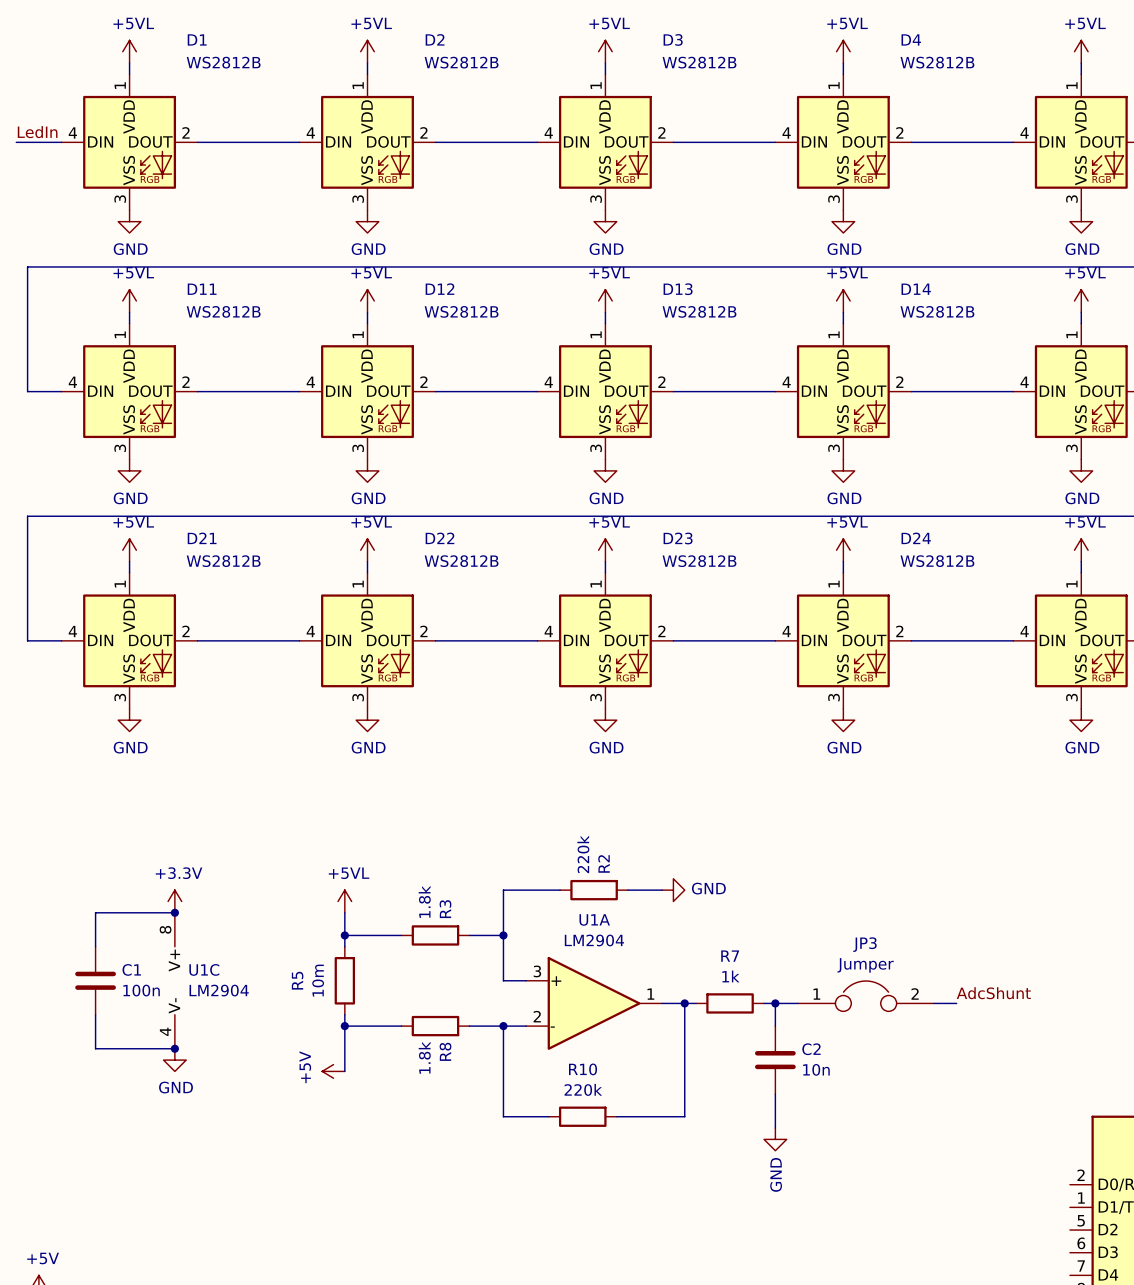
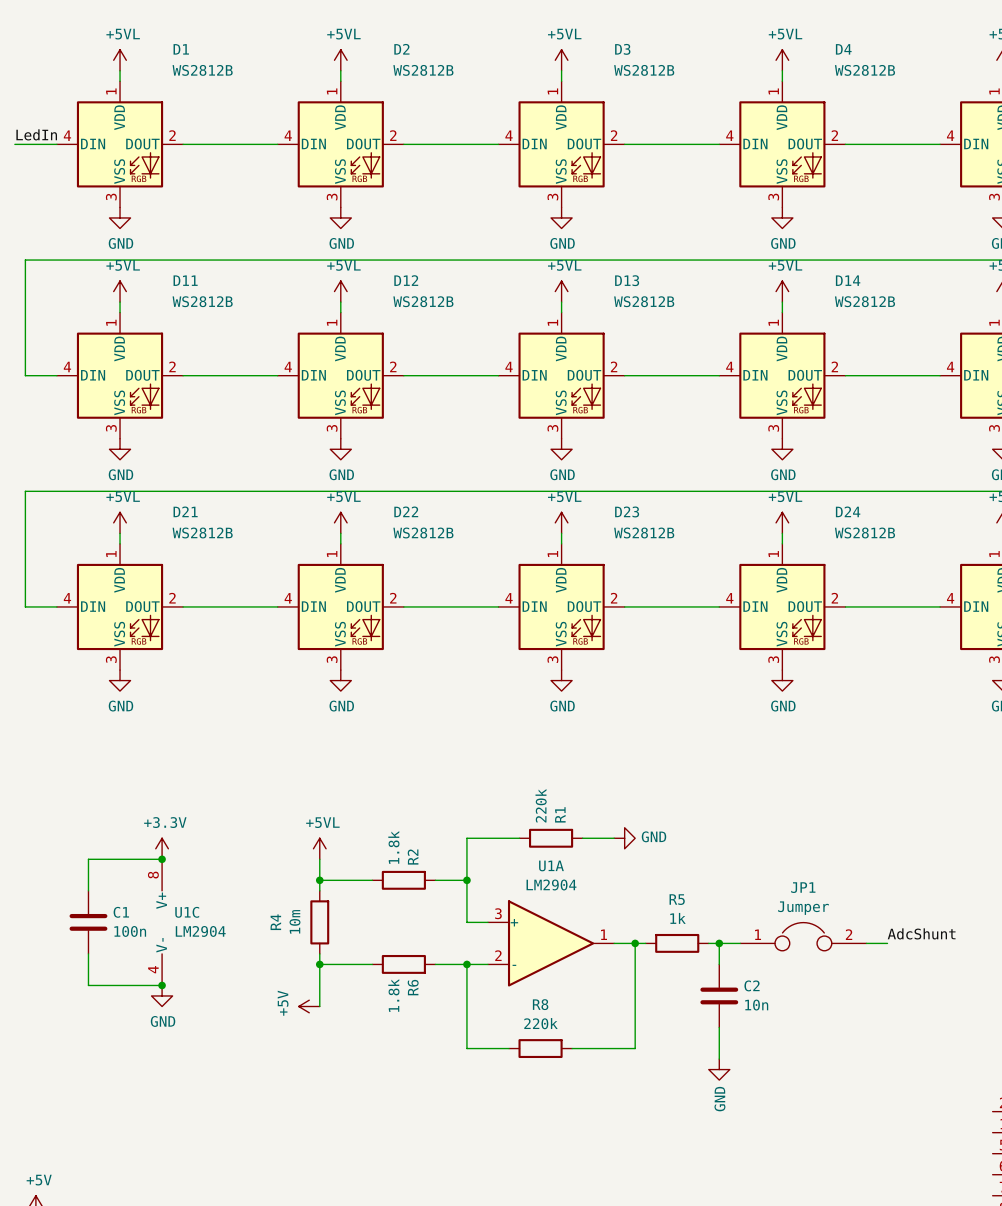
R2 name: R2 (603, 863) -> R1 (560, 814)
R3 name: R3 (445, 909) -> R2 (413, 857)
JP3 name: JP3 (864, 944) -> JP1 (803, 887)
R7 name: R7 (730, 956) -> R5 (677, 899)
R5 name: R5 (297, 980) -> R4 (275, 922)
R8 name: R8 (445, 1051) -> R6 (413, 987)
R10 name: R10 (583, 1069) -> R8 (540, 1004)

